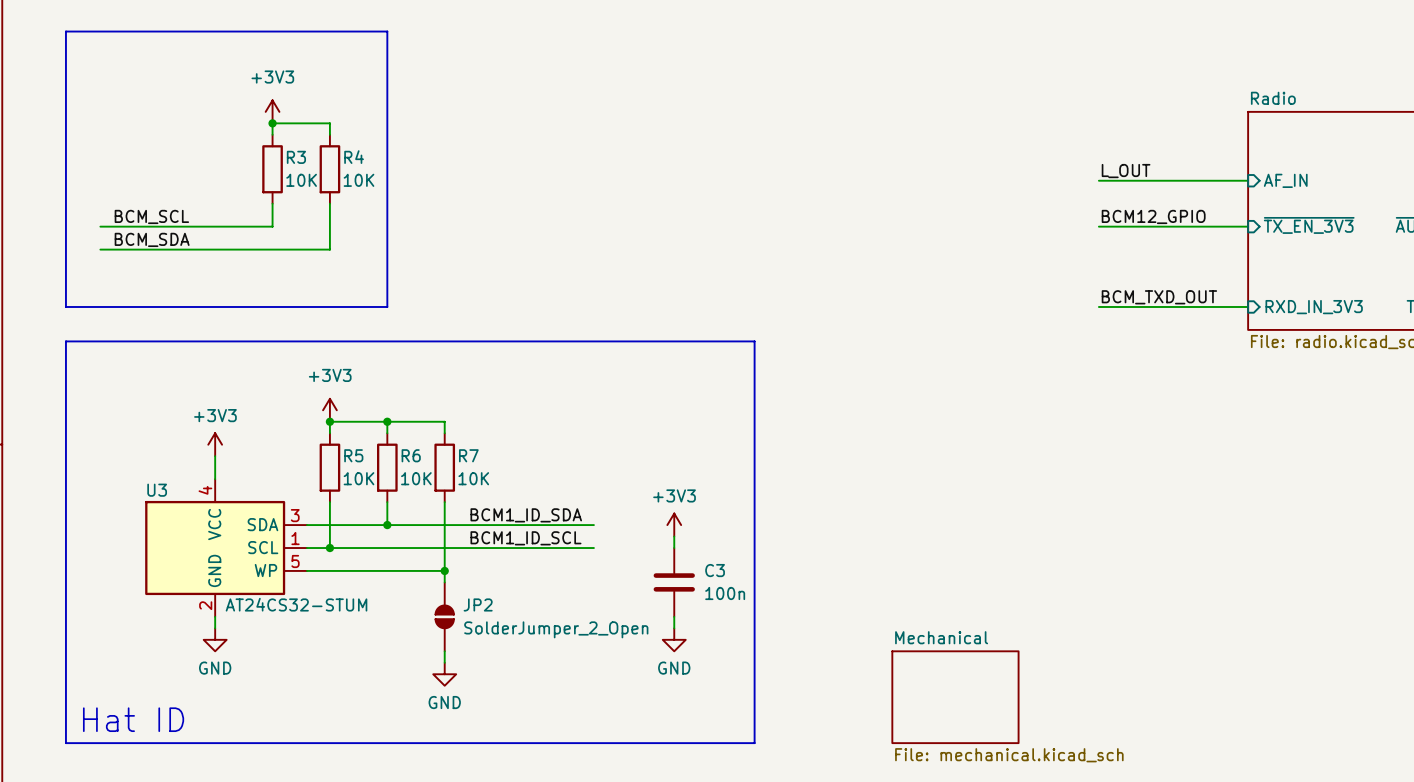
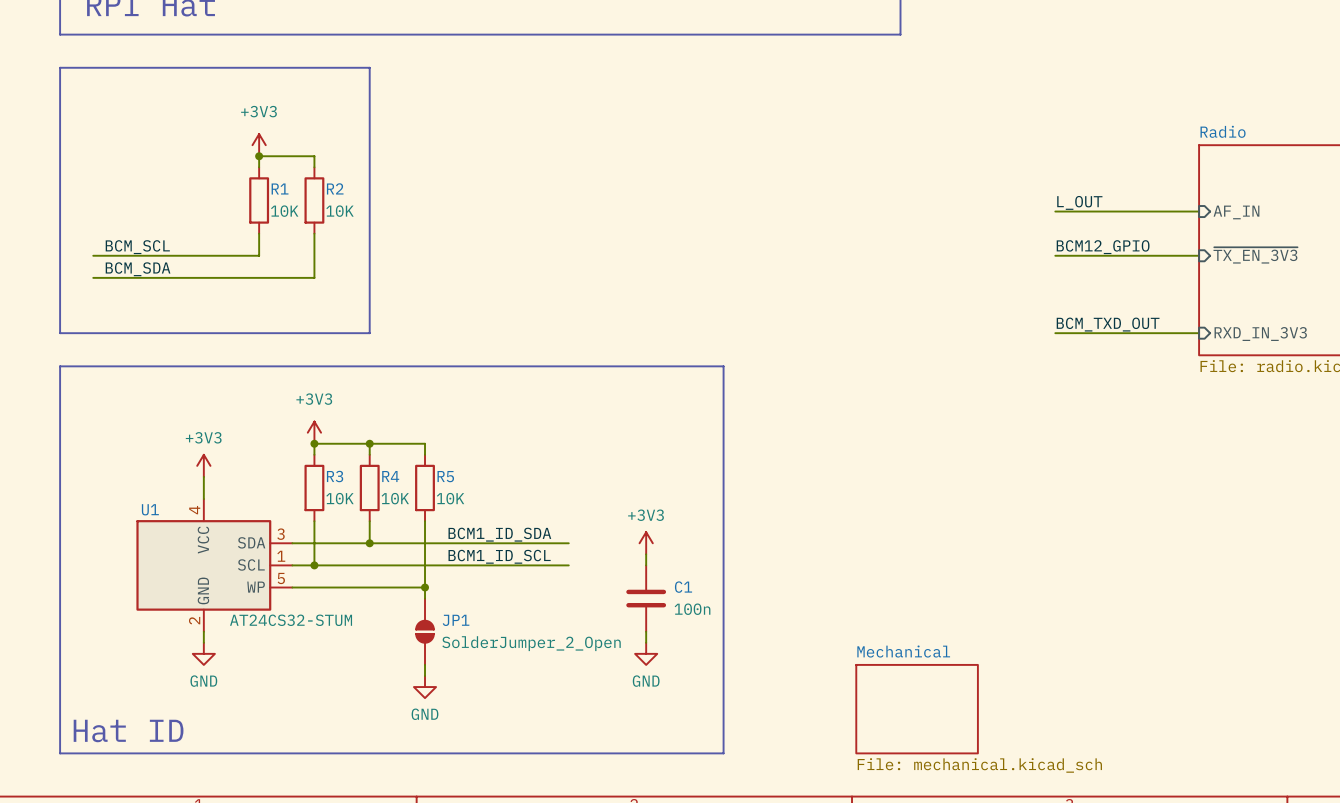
R3 name: R3 (296, 157) -> R1 (280, 189)
R4 name: R4 (354, 157) -> R2 (335, 188)
R5 name: R5 (353, 455) -> R3 (335, 476)
R6 name: R6 (411, 455) -> R4 (390, 476)
R7 name: R7 (468, 455) -> R5 (445, 476)
U3 name: U3 (157, 490) -> U1 (150, 509)
C3 name: C3 (715, 570) -> C1 (683, 587)
JP2 name: JP2 (478, 604) -> JP1 (456, 620)

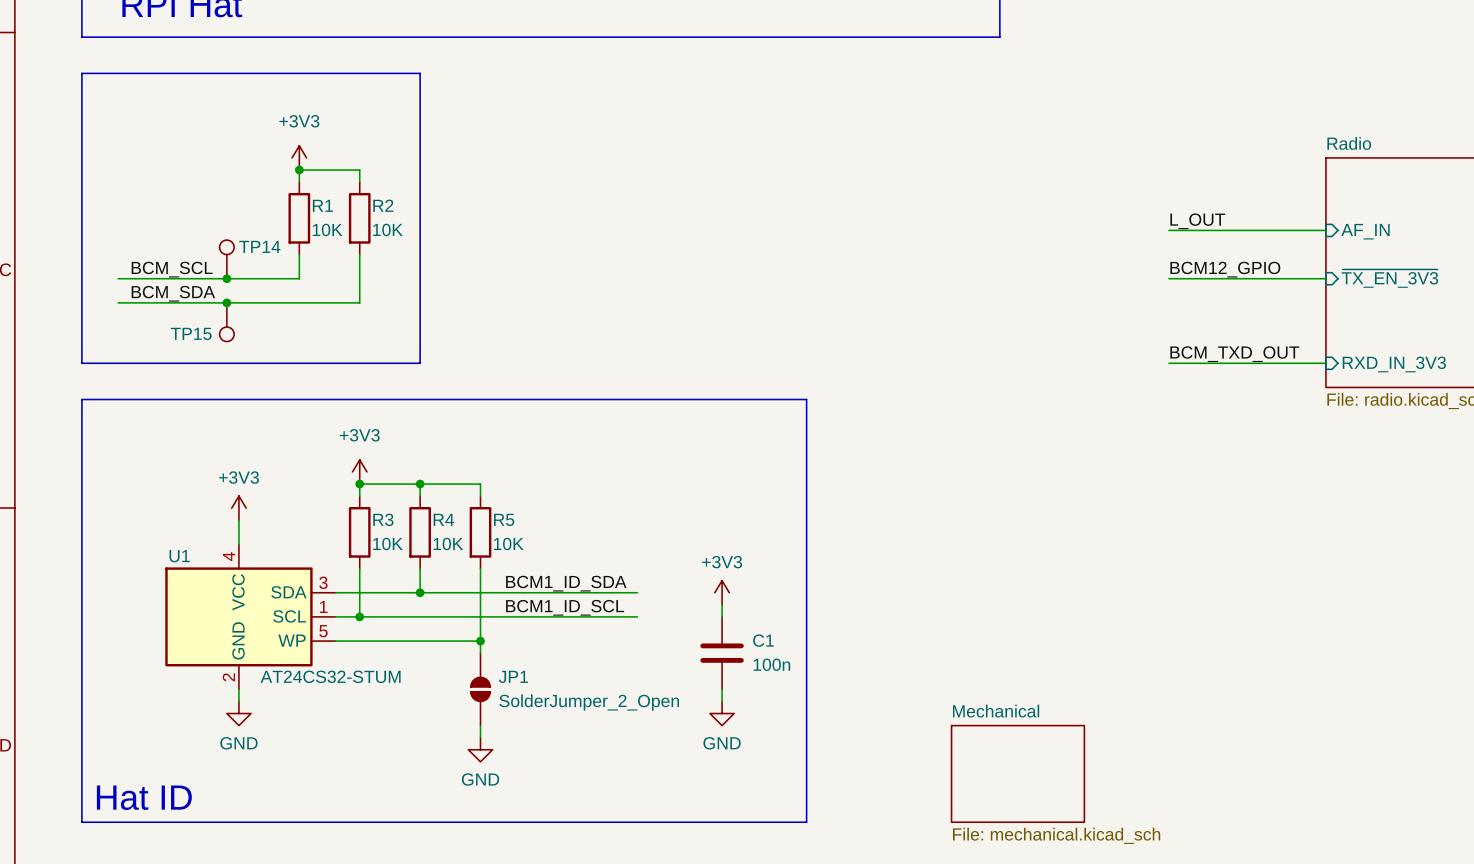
TP14: none -> (226, 259)
junction: none -> (226, 278)
junction: none -> (226, 302)
TP15: none -> (226, 322)

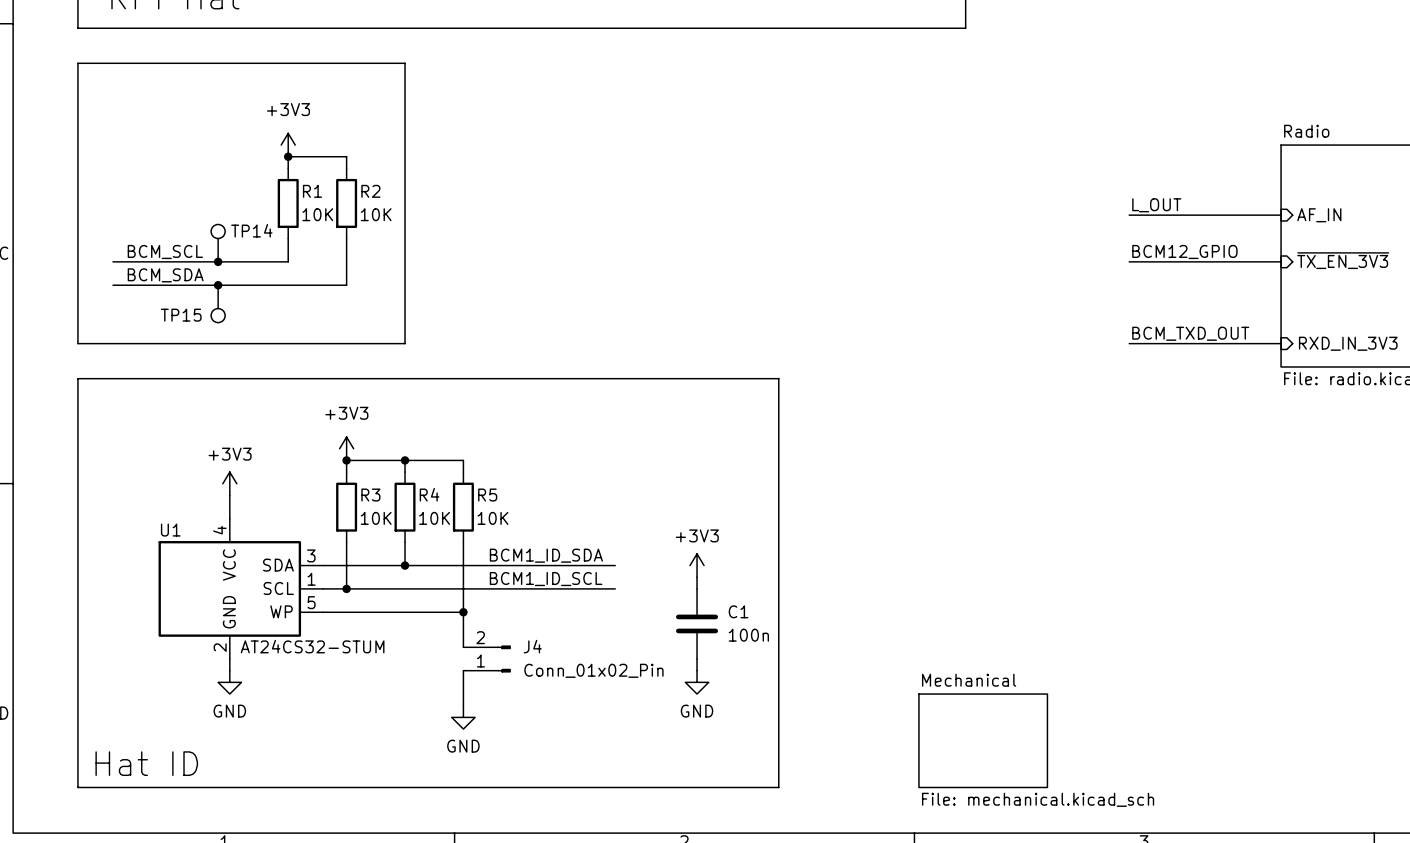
JP1: SolderJumper_2_Open (480, 689) -> none
J4: none -> Conn_01x02_Pin (487, 659)

